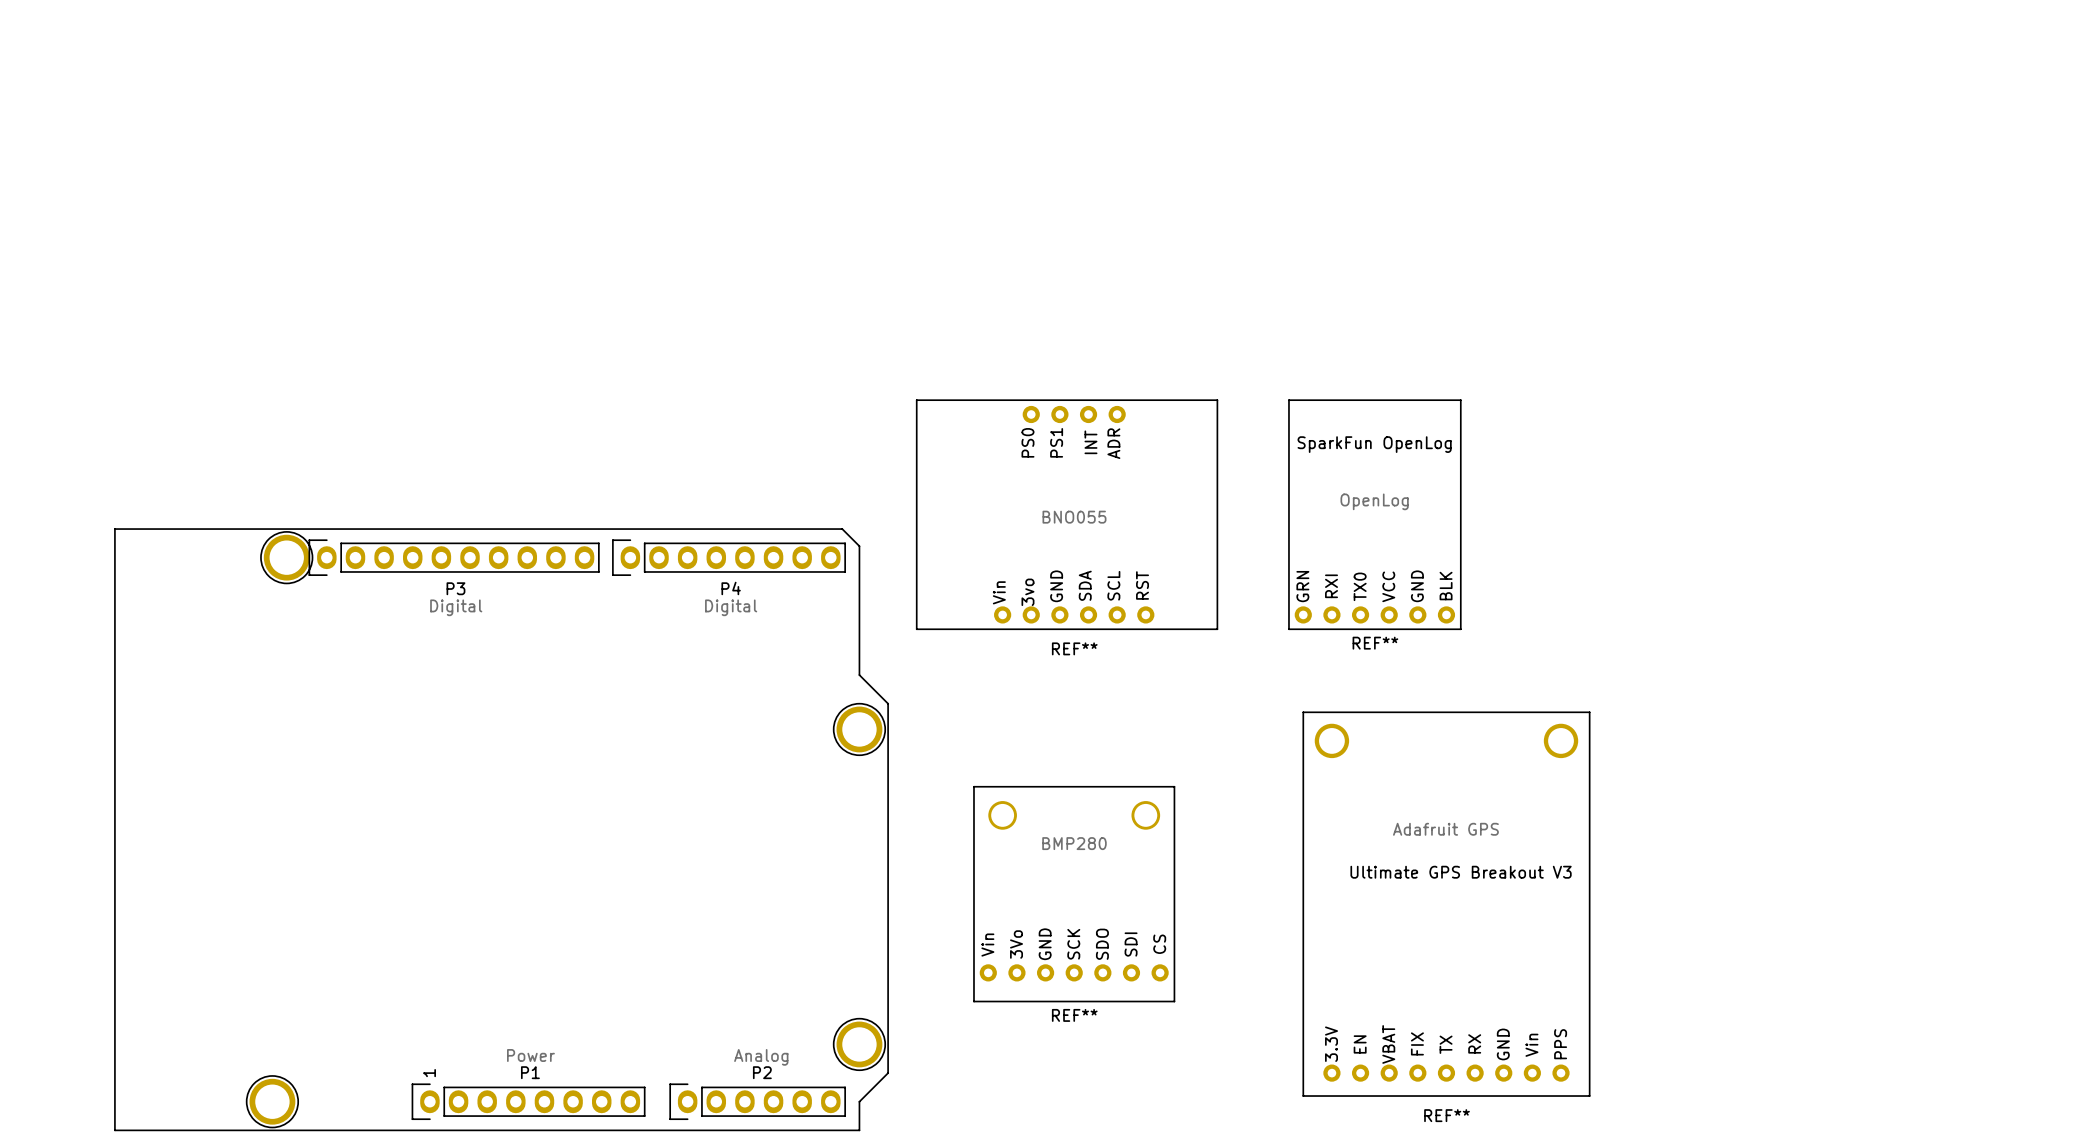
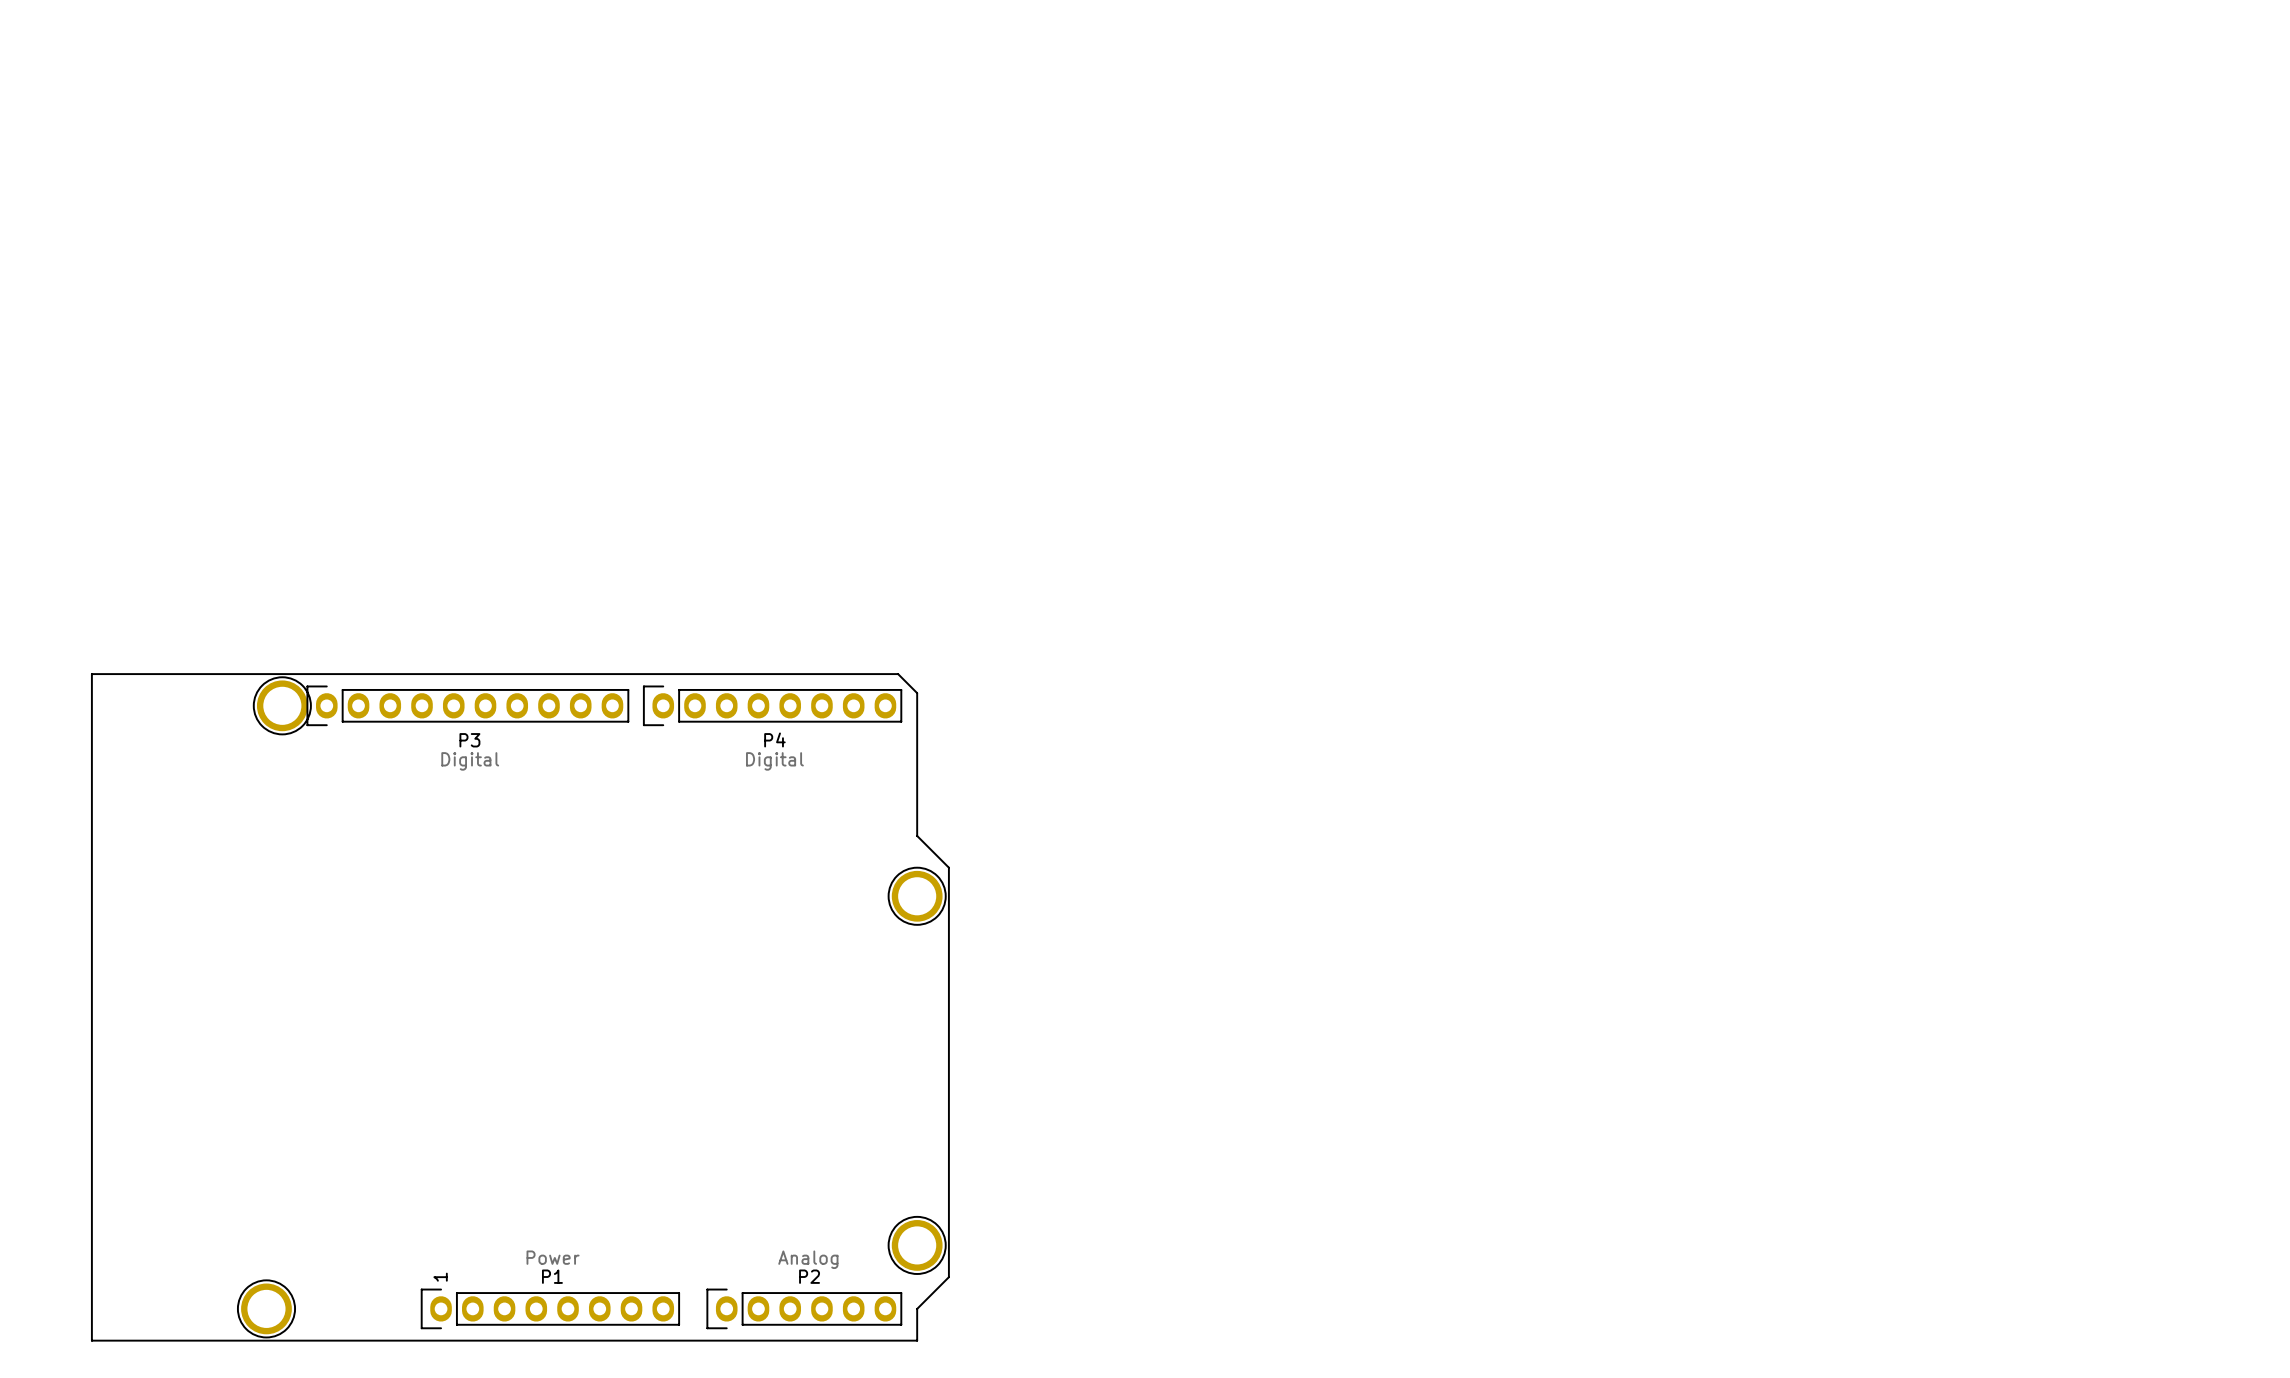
REF**: BNO055 (1067, 514) -> none
REF**: OpenLog (1374, 514) -> none
REF**: BMP280 (1074, 894) -> none
REF**: Adafruit GPS (1446, 904) -> none

